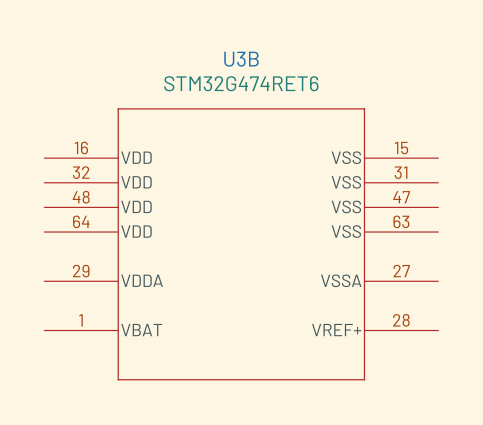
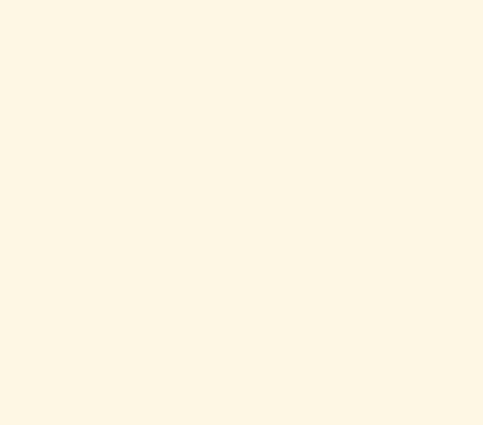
U3B: STM32G474RET6 (241, 244) -> none

